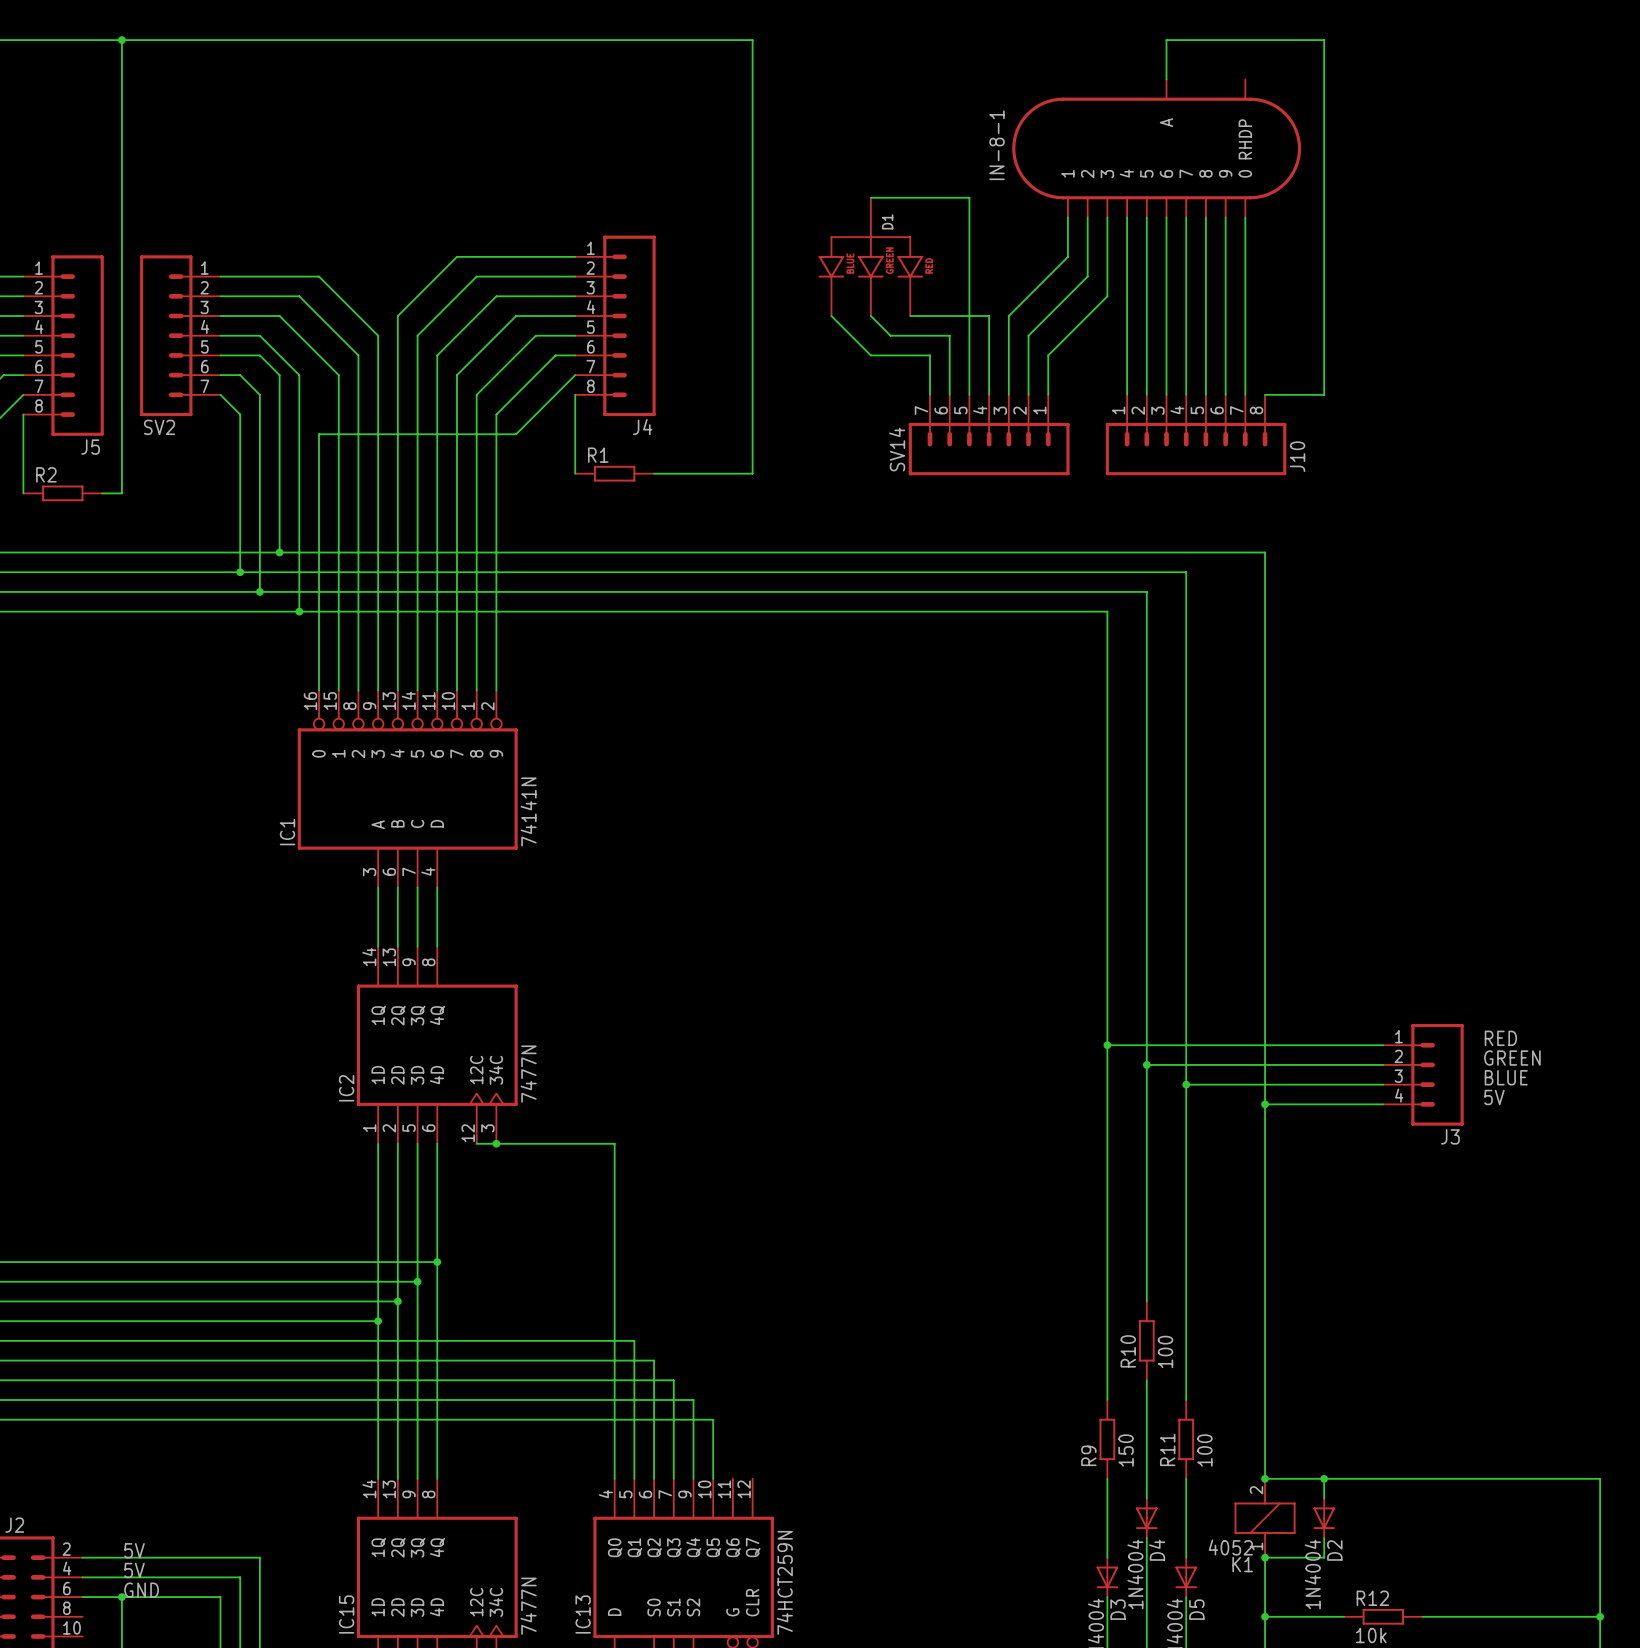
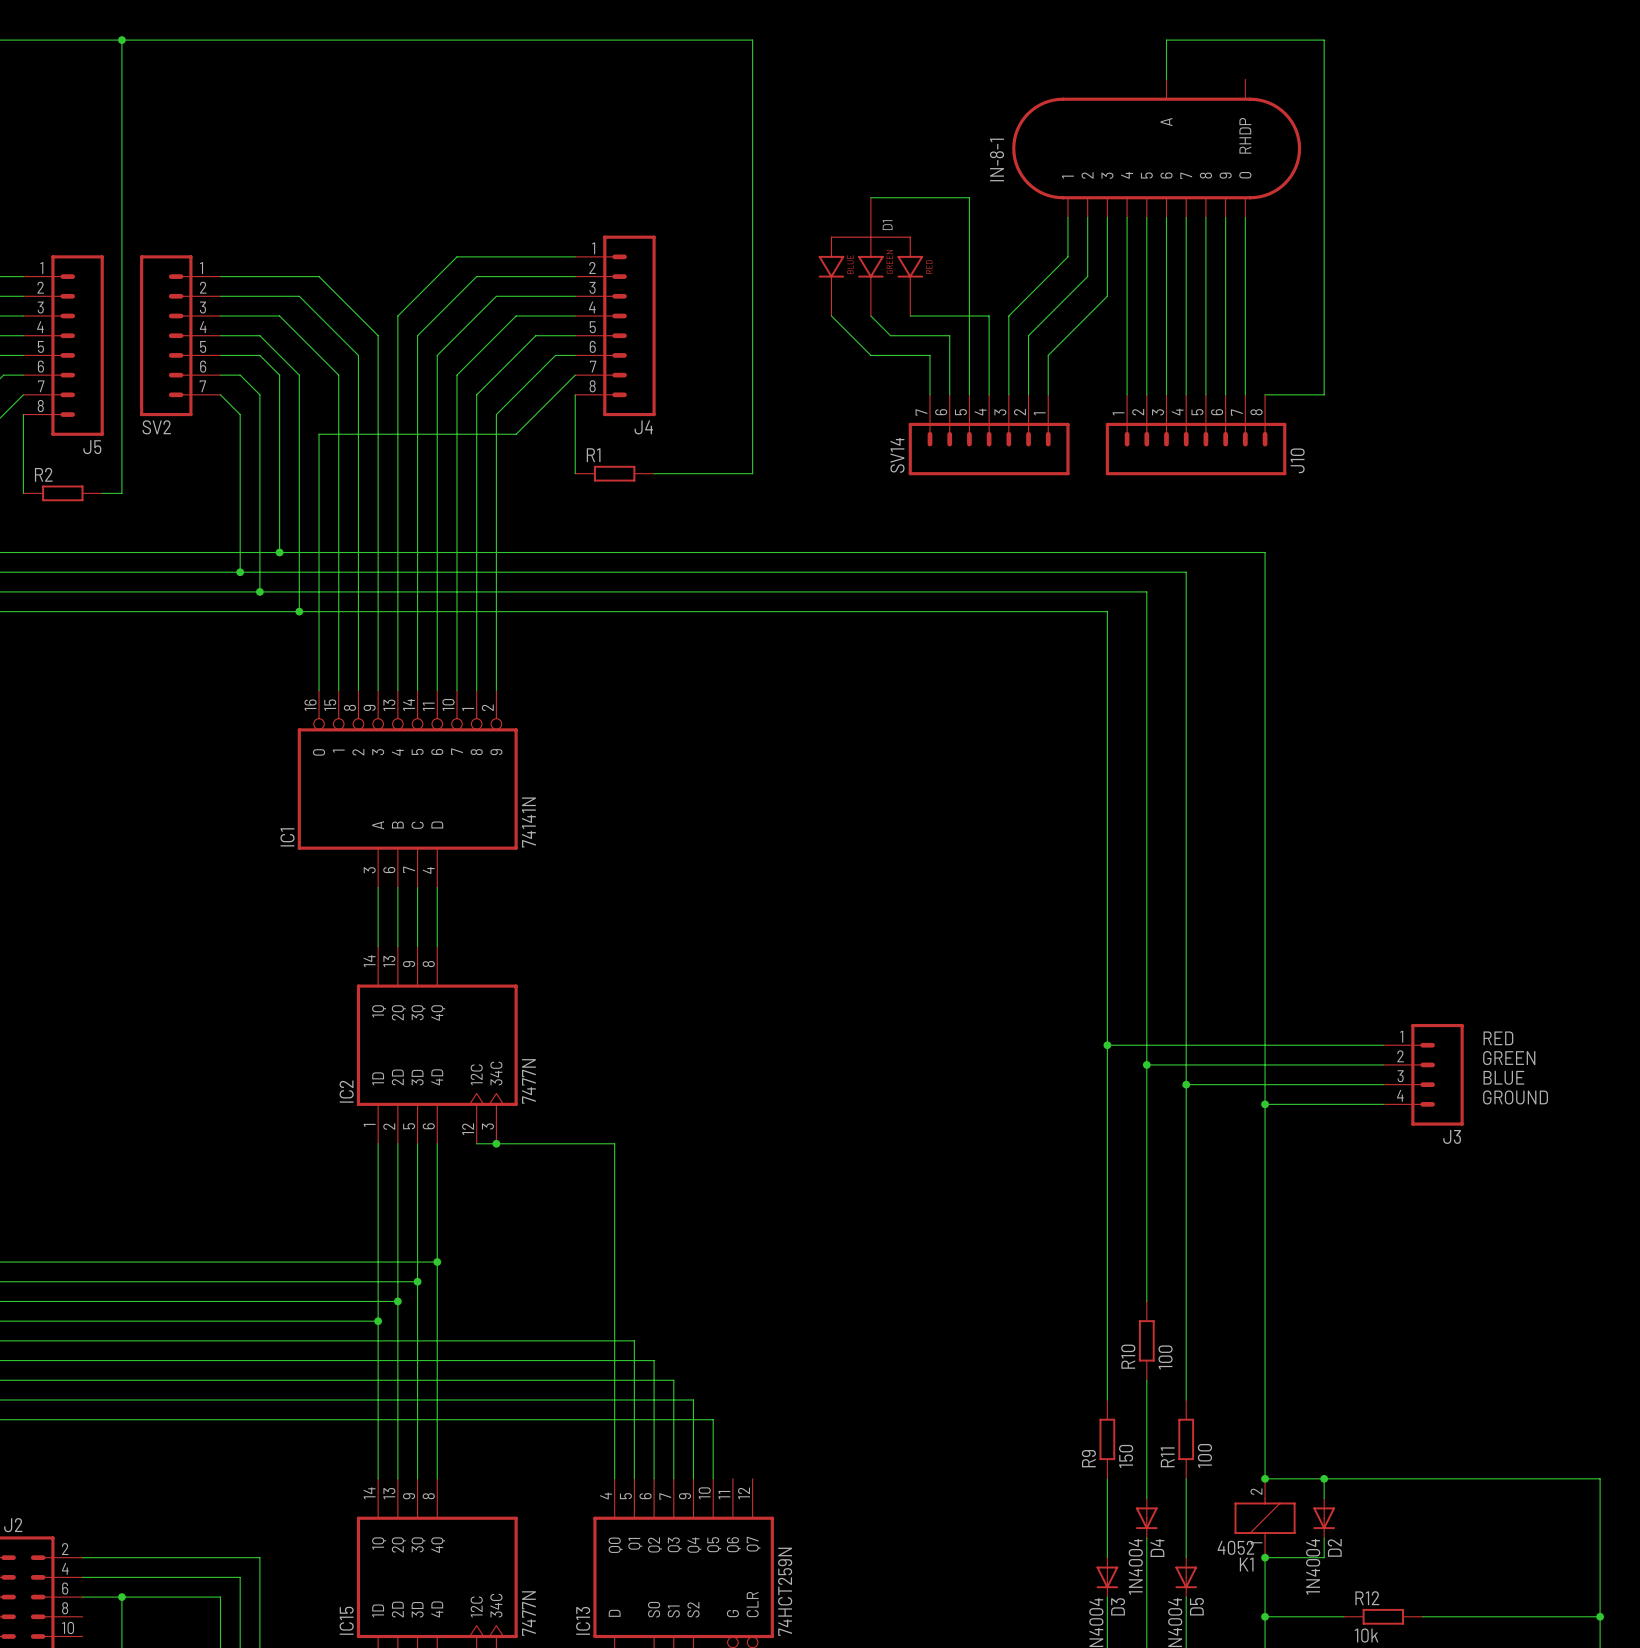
label: 5V (1494, 1097) -> GROUND (1515, 1097)
text: 5V (134, 1550) -> none
text: 5V (134, 1570) -> none
text: GND (141, 1590) -> none

